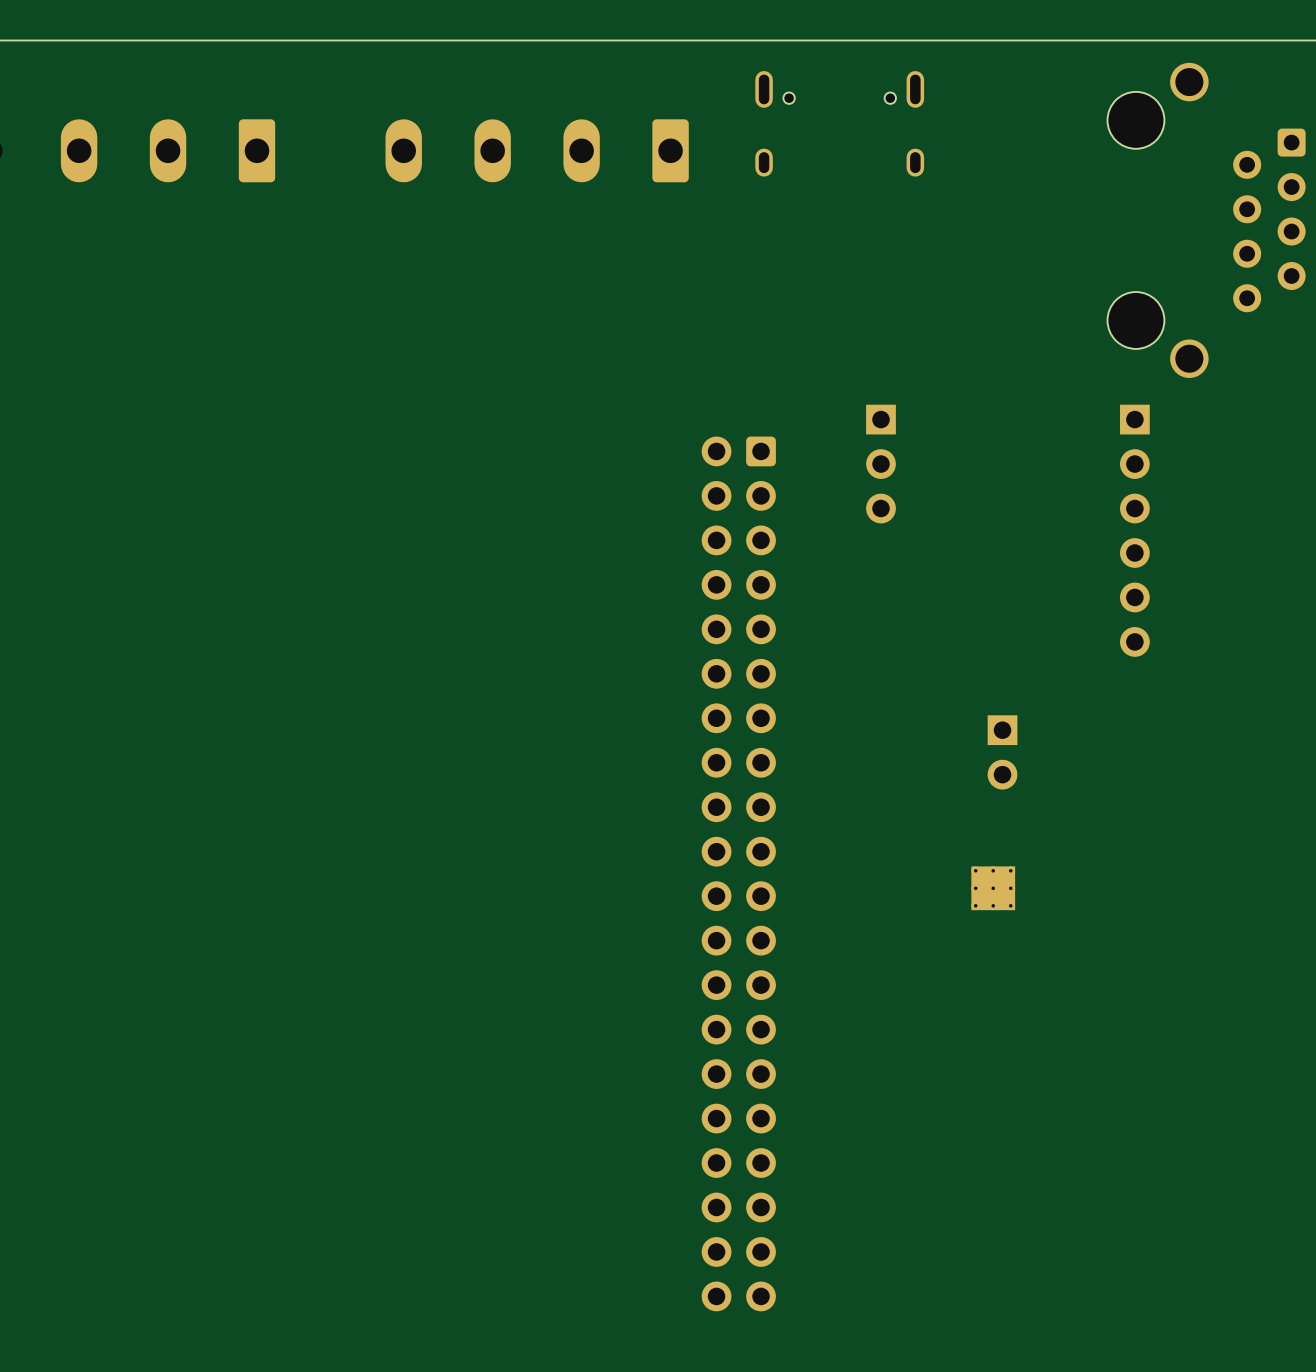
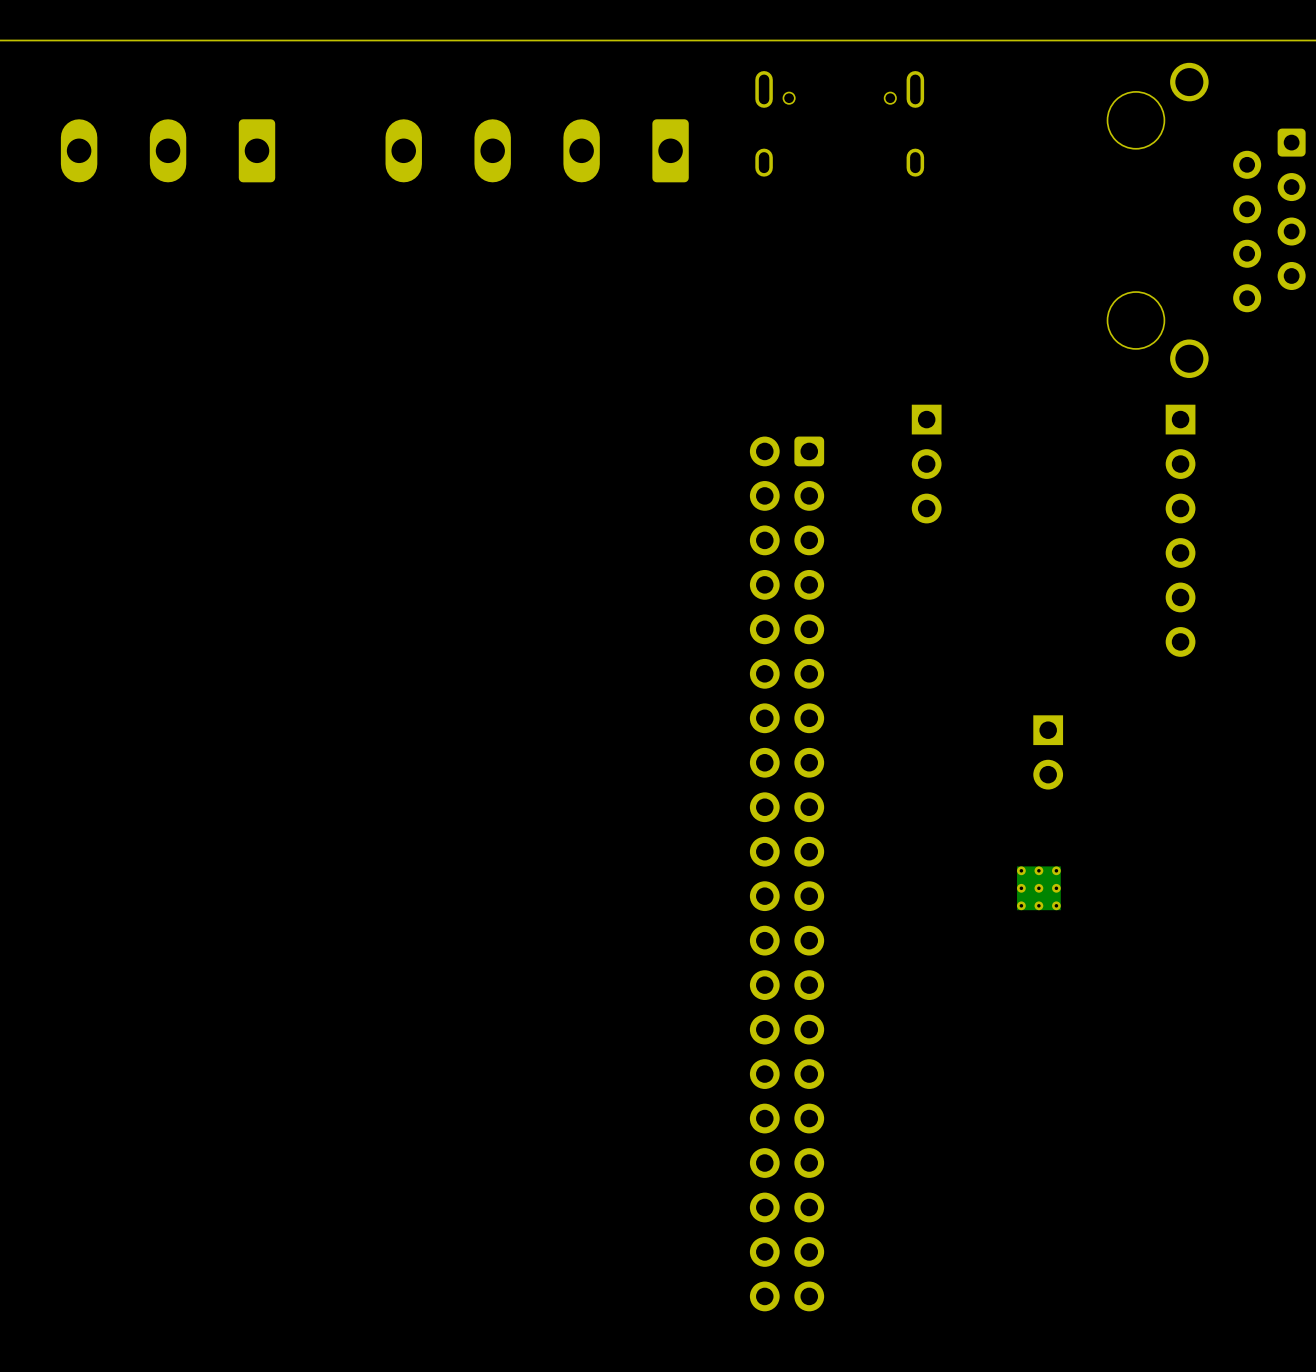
part position: (881, 464) -> (926, 464)
part position: (1134, 530) -> (1180, 530)
part position: (1002, 752) -> (1048, 752)
part position: (738, 873) -> (787, 873)
part position: (993, 888) -> (1038, 888)

